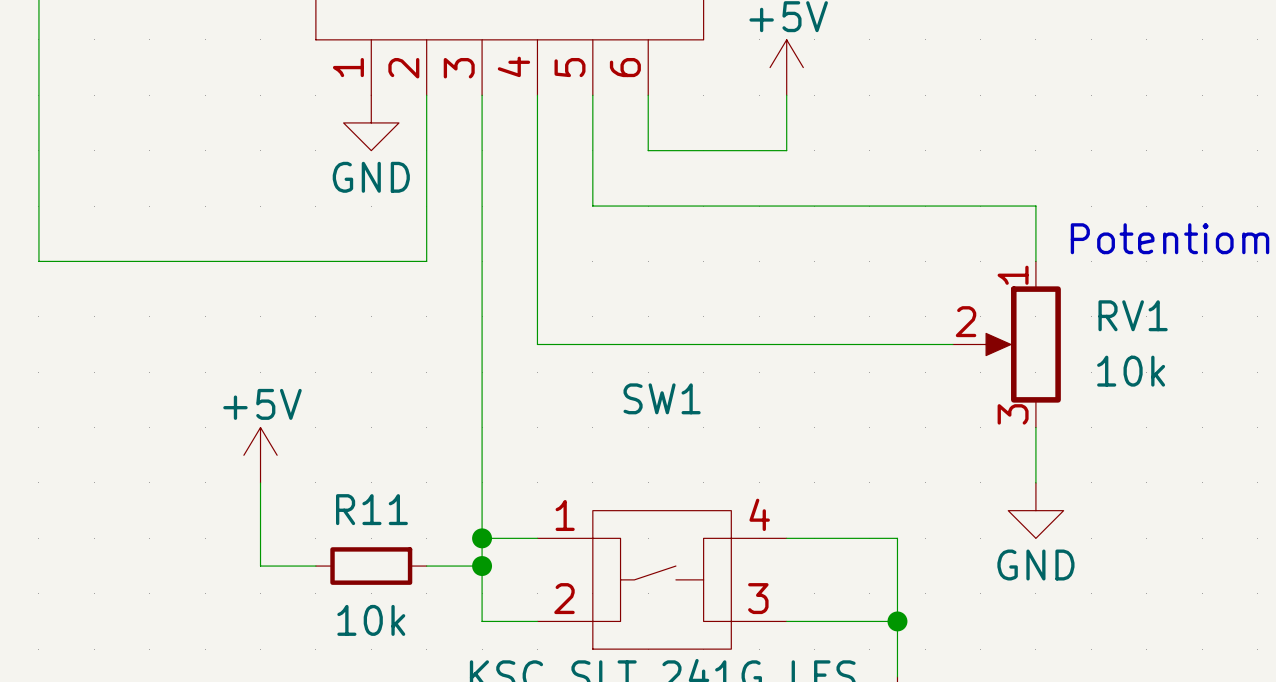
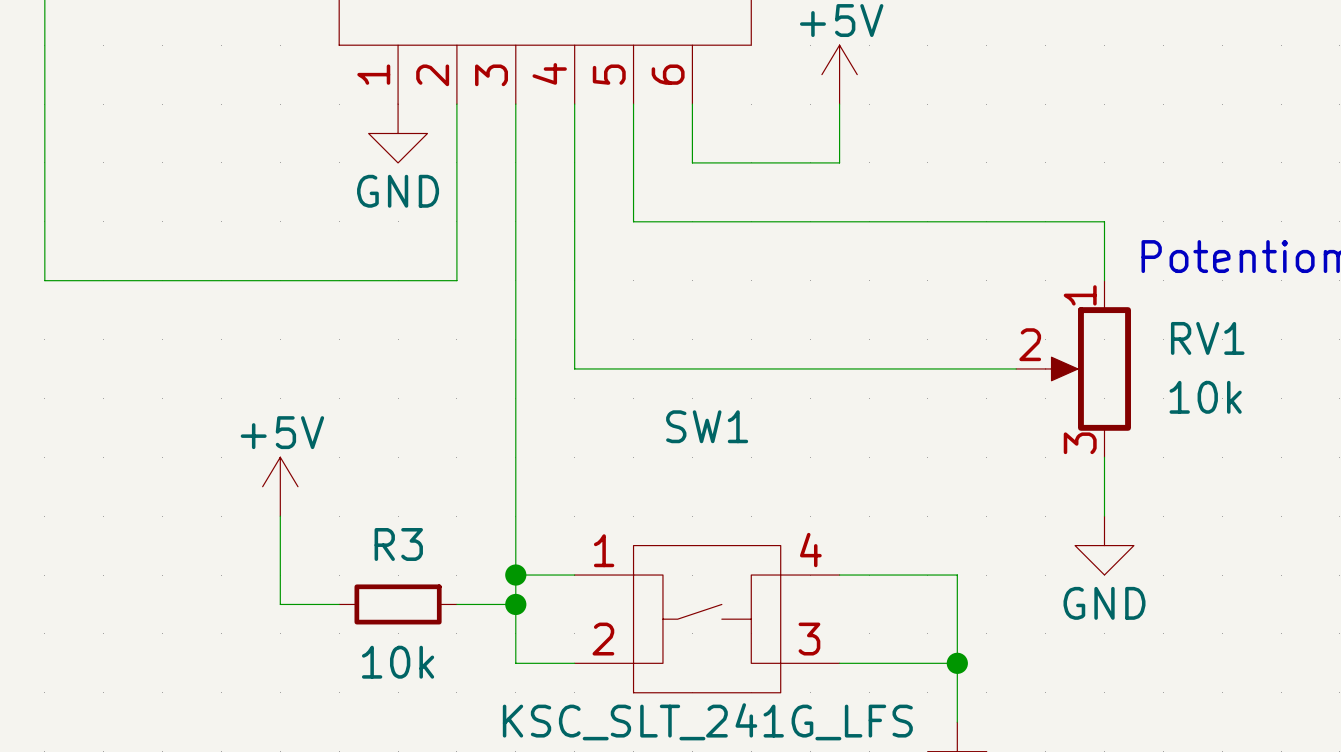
R11 name: R11 (371, 509) -> R3 (398, 544)

